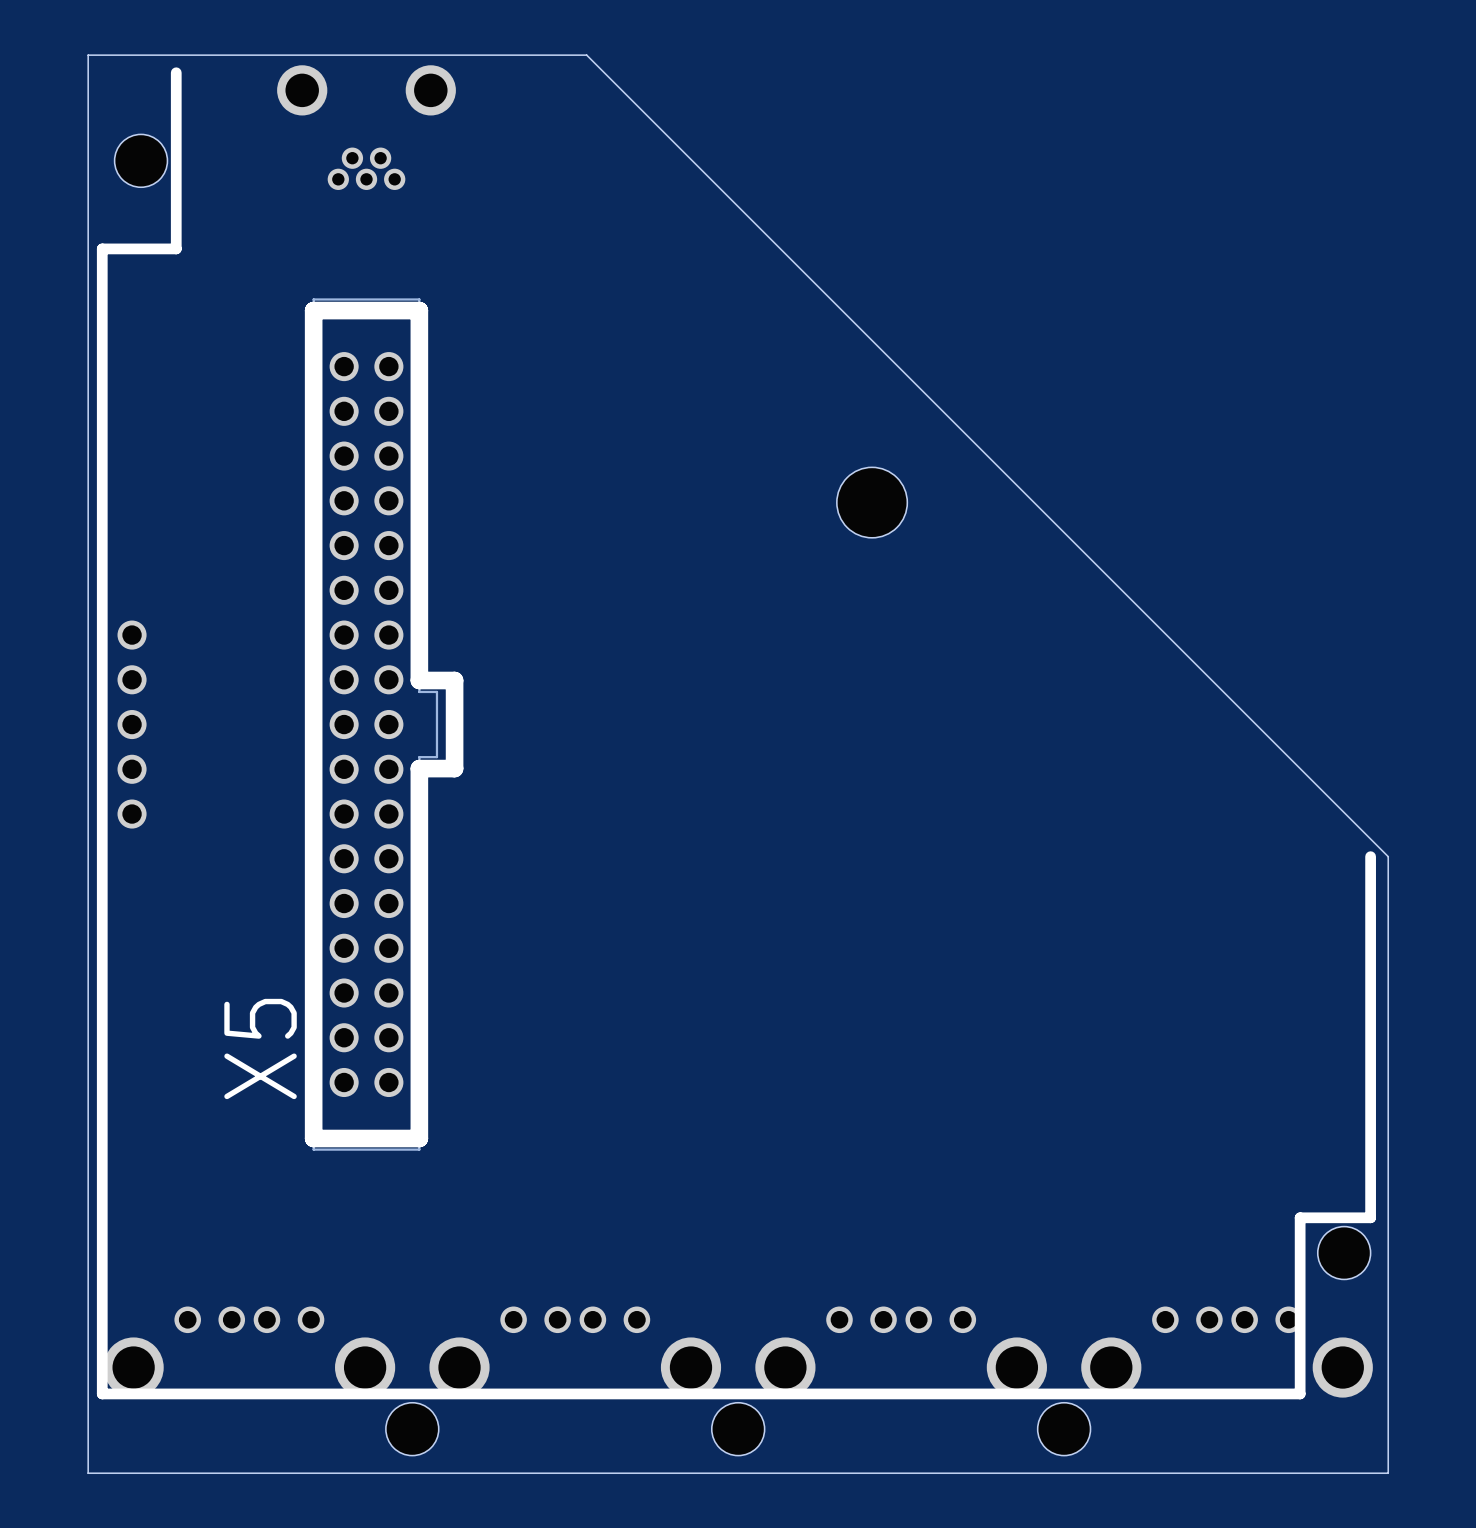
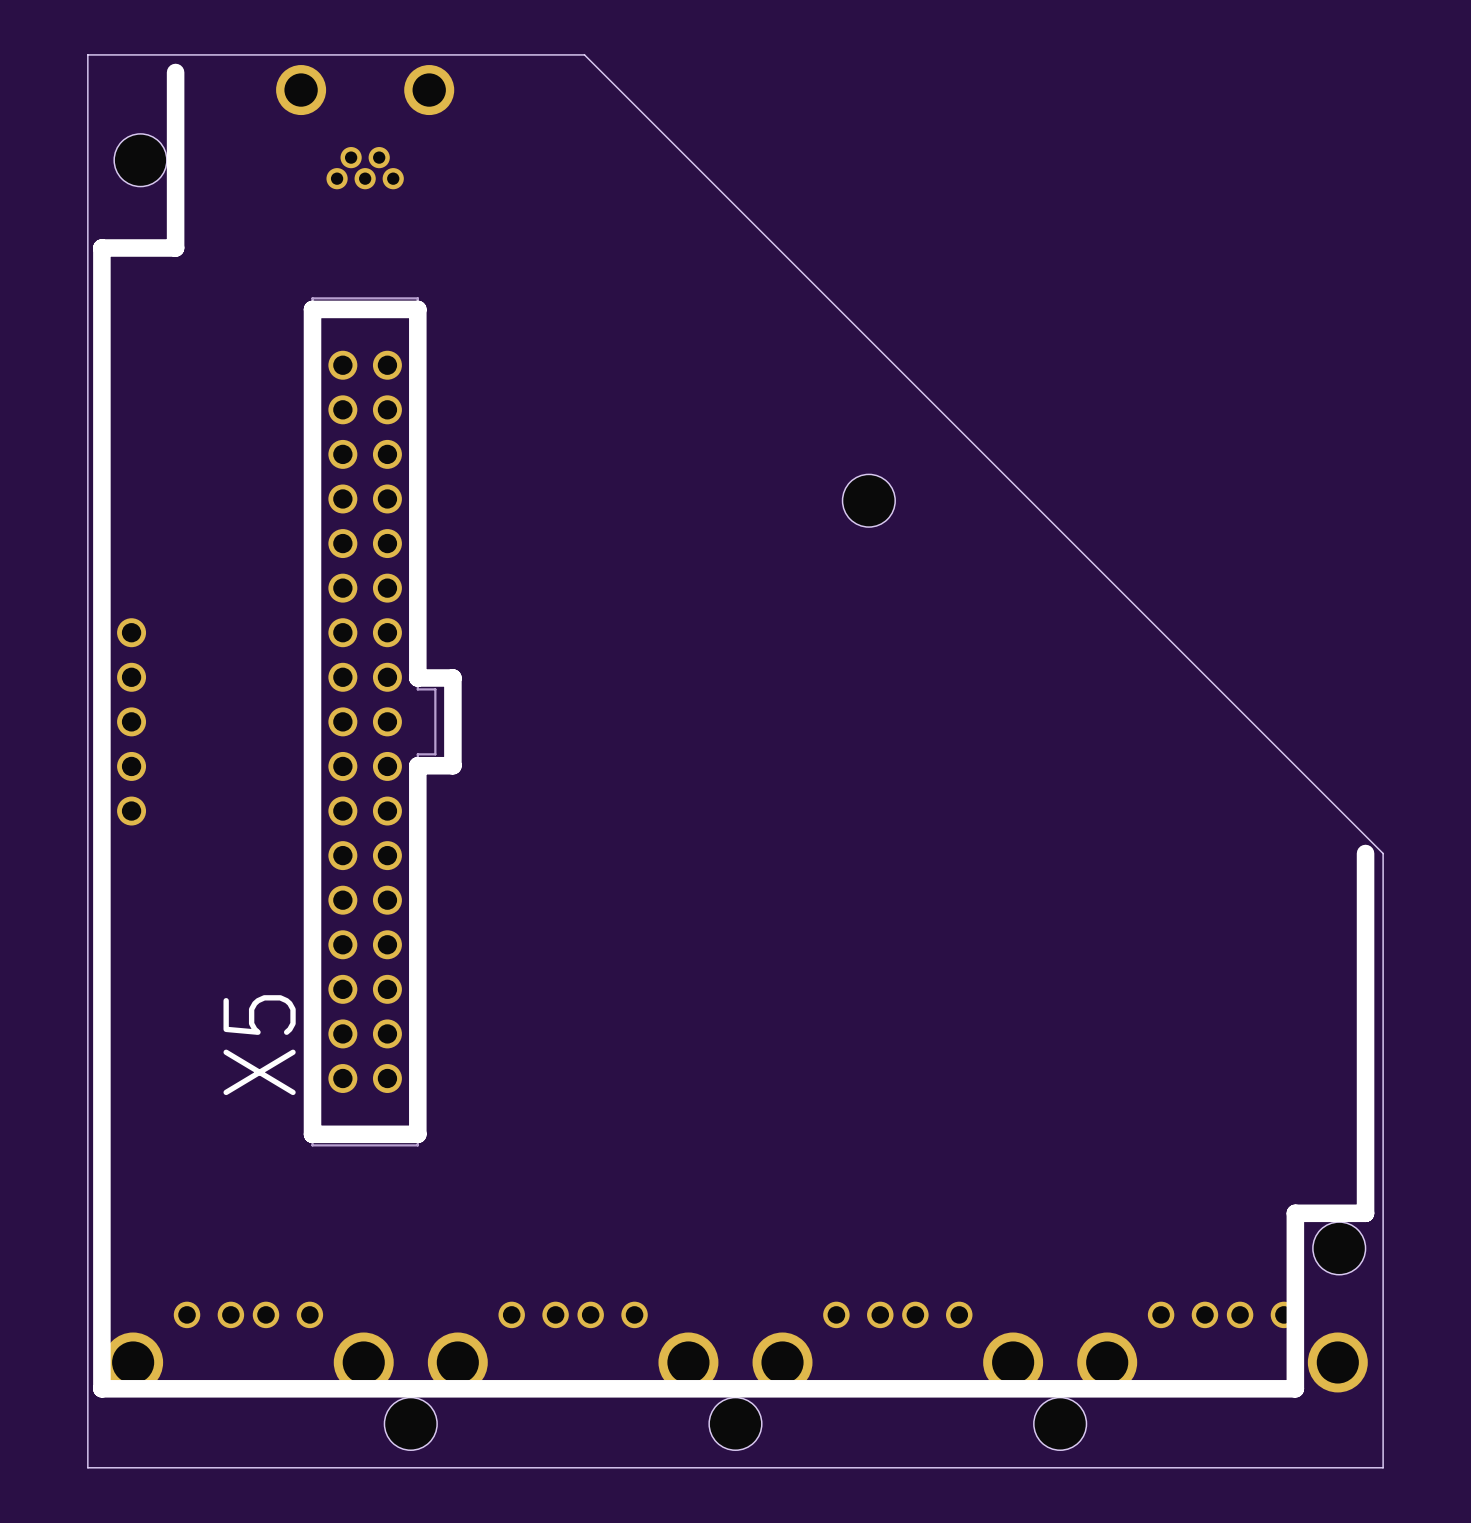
line width: thin (176, 72) (176, 248) (102, 248) (102, 1393) (1300, 1393) (1300, 1217) (1370, 1217) (1370, 856) -> thick (175, 72) (175, 248) (101, 248) (101, 1388) (1295, 1388) (1295, 1213) (1365, 1213) (1365, 853)
hole size: [836, 467, 908, 538] -> [842, 474, 896, 528]

